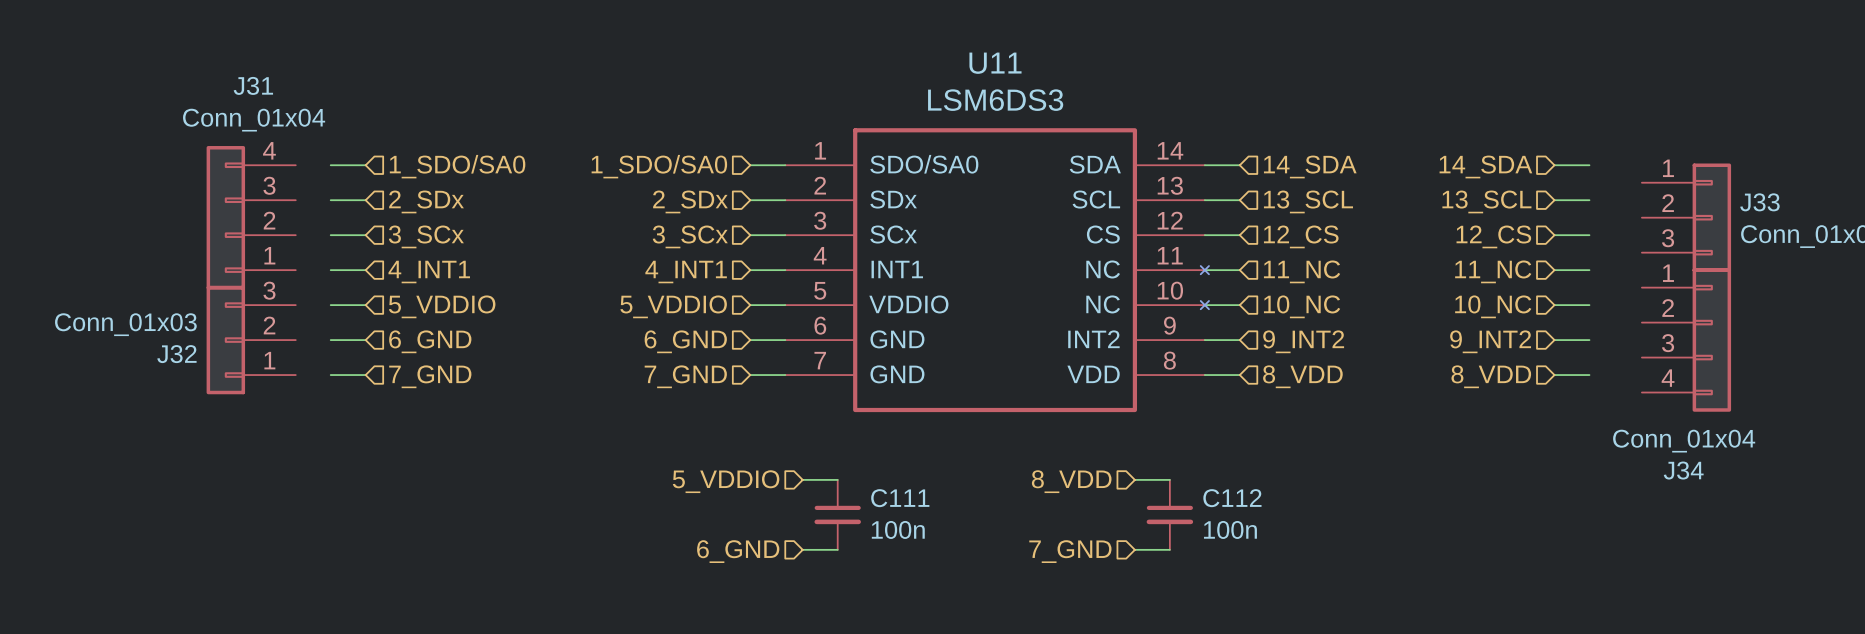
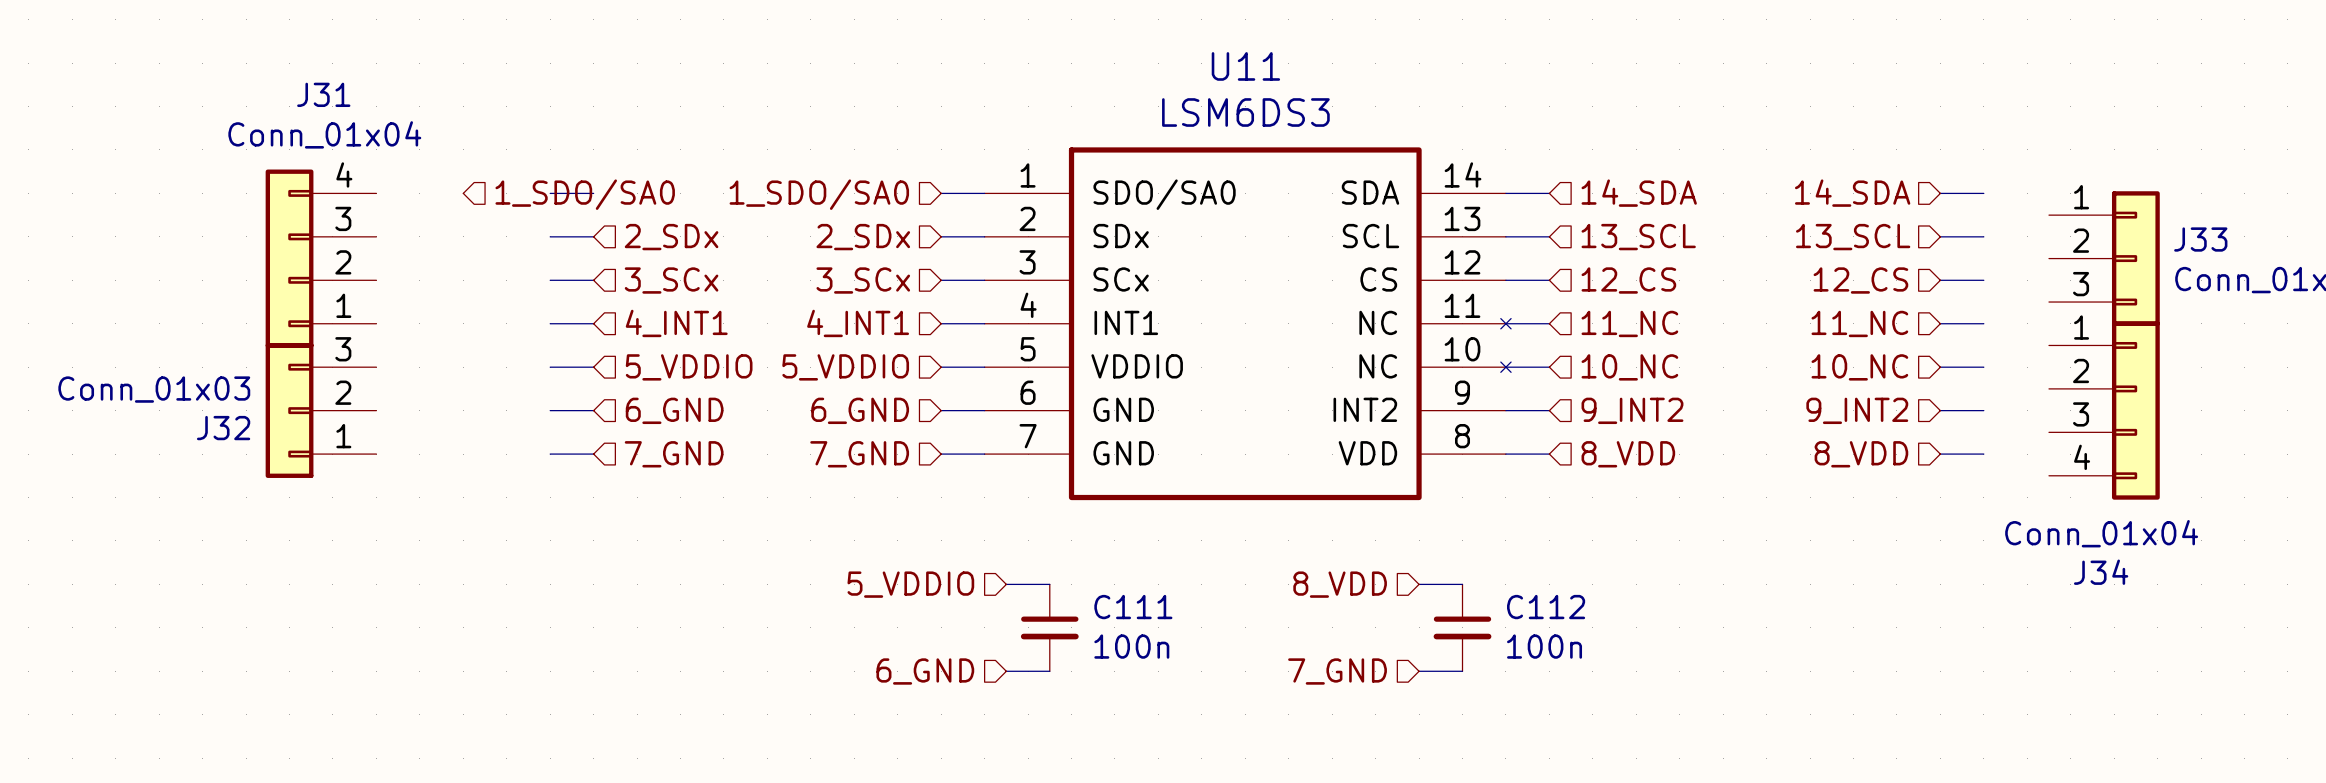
wire: (330, 165) (365, 165) -> (550, 193) (593, 193)
wire: (330, 200) (365, 200) -> (550, 236) (593, 236)
hierarchical label position: 2_SDx (426, 201) -> 2_SDx (671, 237)
wire: (330, 235) (365, 235) -> (550, 280) (593, 280)
hierarchical label position: 3_SCx (426, 236) -> 3_SCx (671, 280)
wire: (330, 270) (365, 270) -> (550, 323) (593, 323)
hierarchical label position: 4_INT1 (429, 272) -> 4_INT1 (676, 323)
wire: (330, 305) (365, 305) -> (550, 367) (593, 367)
hierarchical label position: 5_VDDIO (442, 306) -> 5_VDDIO (689, 367)
wire: (330, 340) (365, 340) -> (550, 410) (593, 410)
hierarchical label position: 6_GND (430, 341) -> 6_GND (674, 410)
wire: (330, 375) (365, 375) -> (550, 454) (593, 454)
hierarchical label position: 7_GND (430, 376) -> 7_GND (674, 454)

